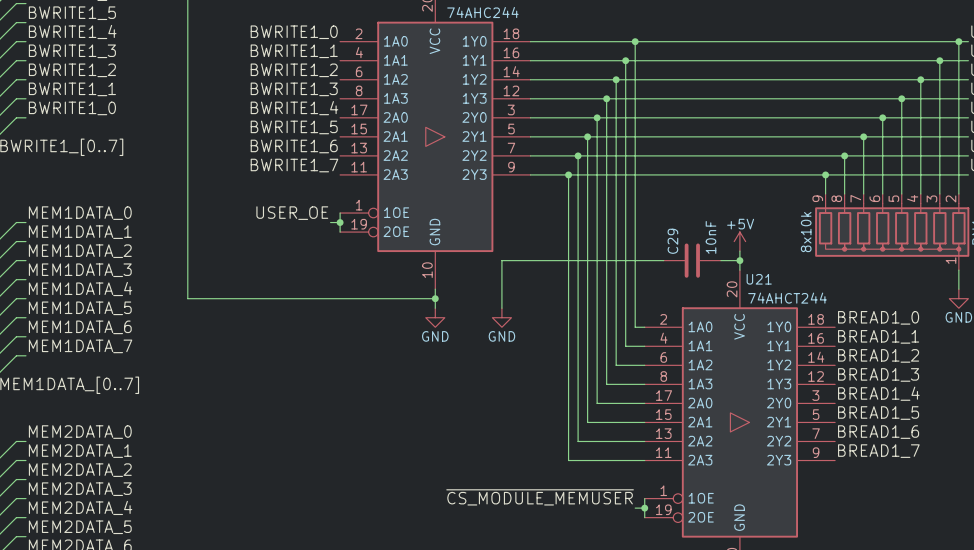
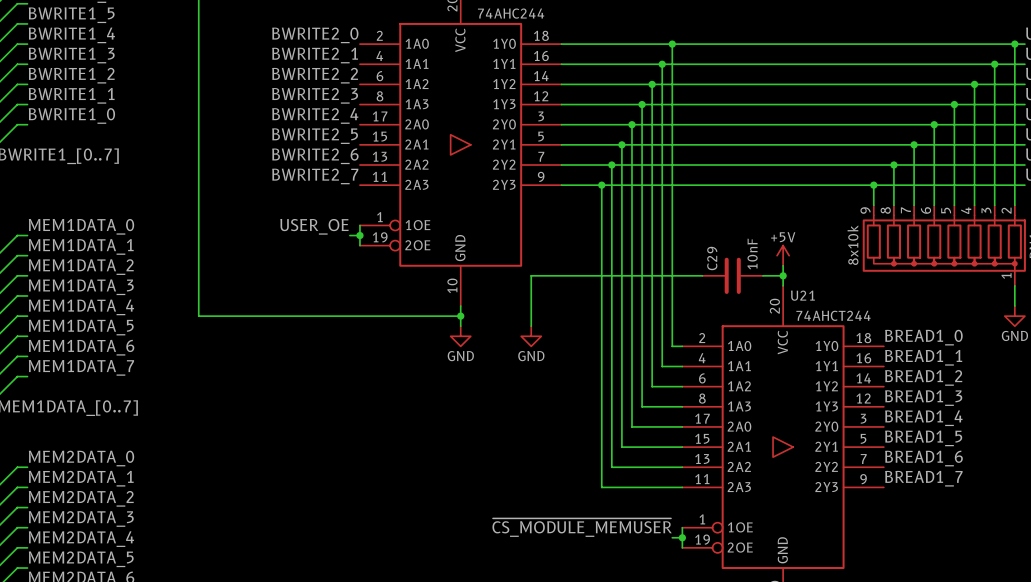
label: BWRITE1_0 (294, 32) -> BWRITE2_0 (315, 35)
label: BWRITE1_1 (294, 51) -> BWRITE2_1 (315, 55)
label: BWRITE1_2 (294, 70) -> BWRITE2_2 (315, 75)
label: BWRITE1_3 (294, 89) -> BWRITE2_3 (315, 95)
label: BWRITE1_4 (294, 108) -> BWRITE2_4 (315, 115)
label: BWRITE1_5 (294, 127) -> BWRITE2_5 (315, 136)
label: BWRITE1_6 (294, 146) -> BWRITE2_6 (315, 156)
label: BWRITE1_7 (294, 165) -> BWRITE2_7 (315, 176)

